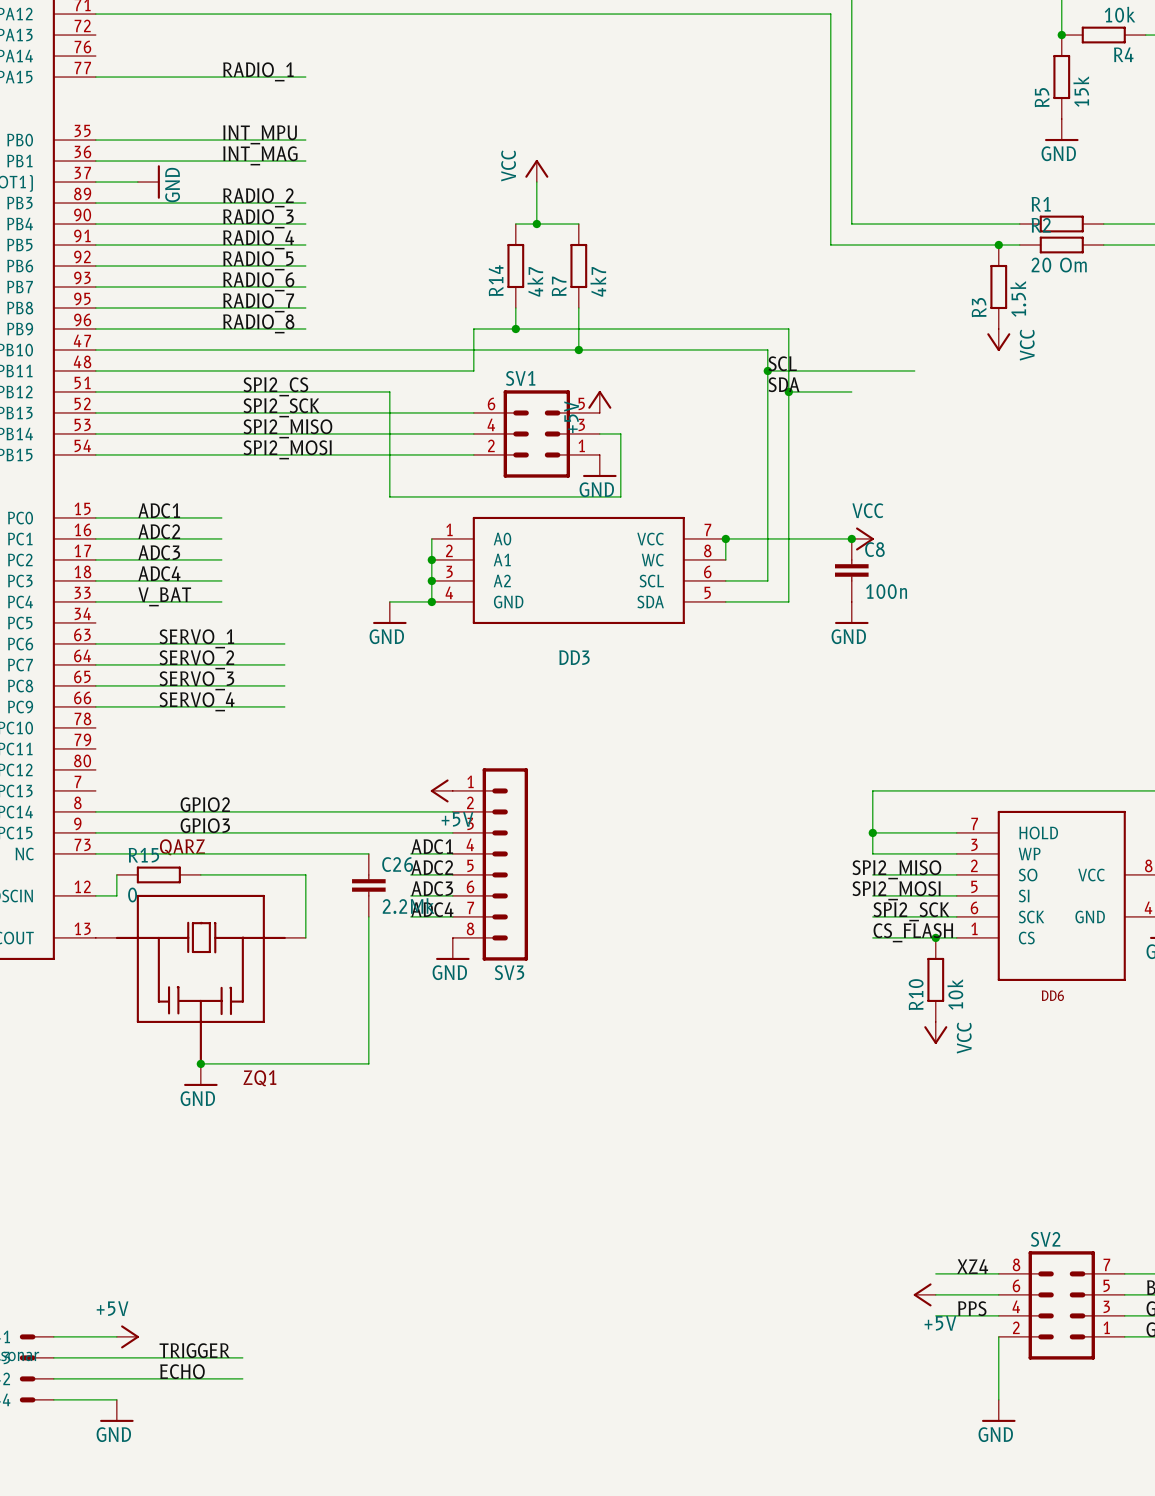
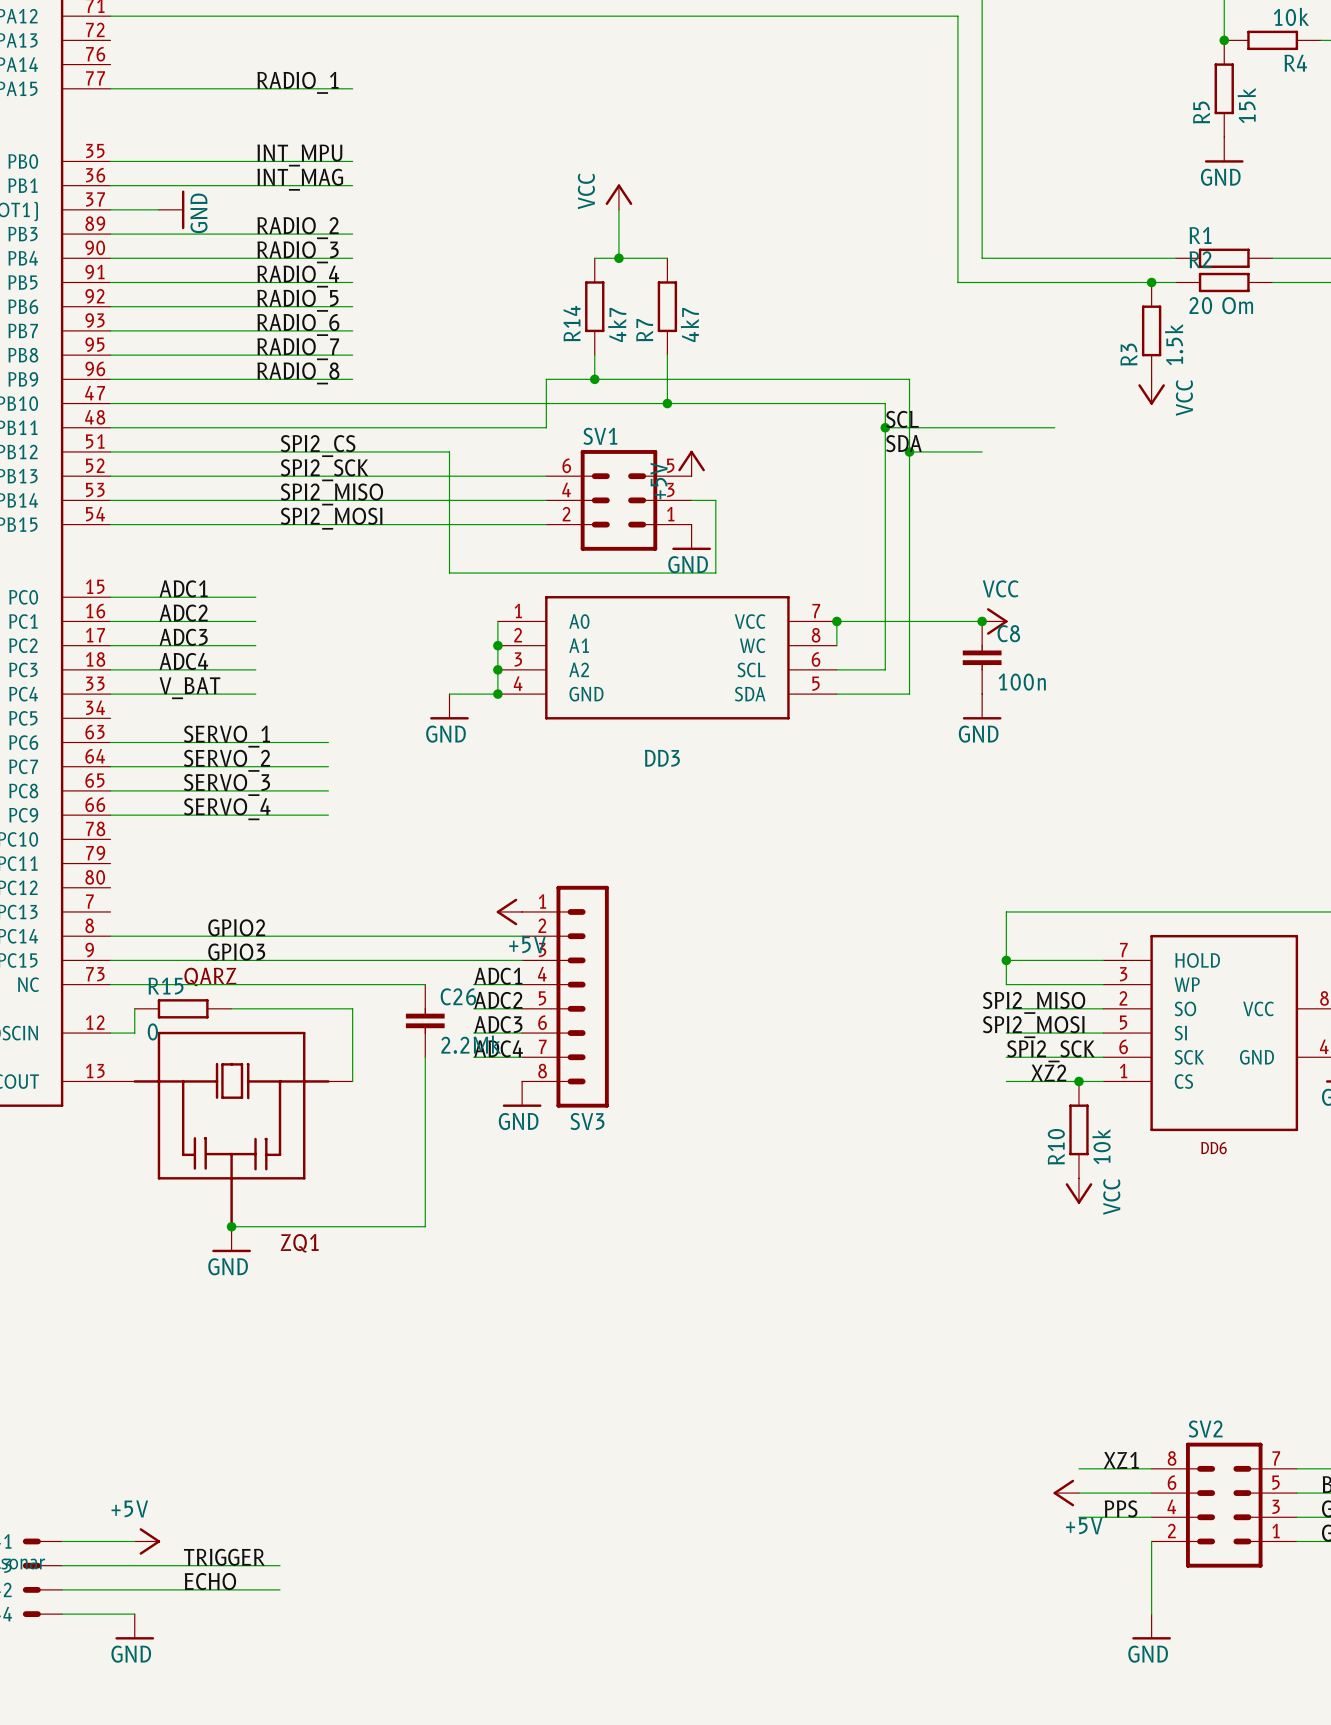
label: none -> XZ2 (1048, 1072)
label: CS_FLASH (913, 932) -> none
label: XZ4 (972, 1266) -> XZ1 (1121, 1460)

